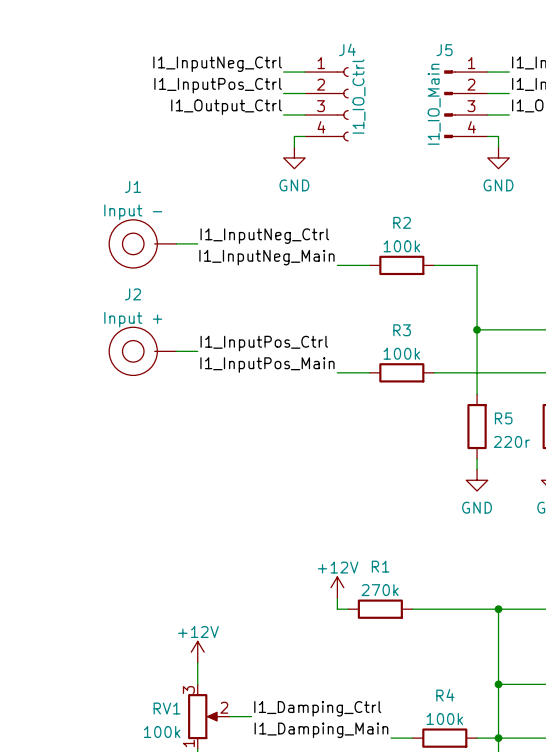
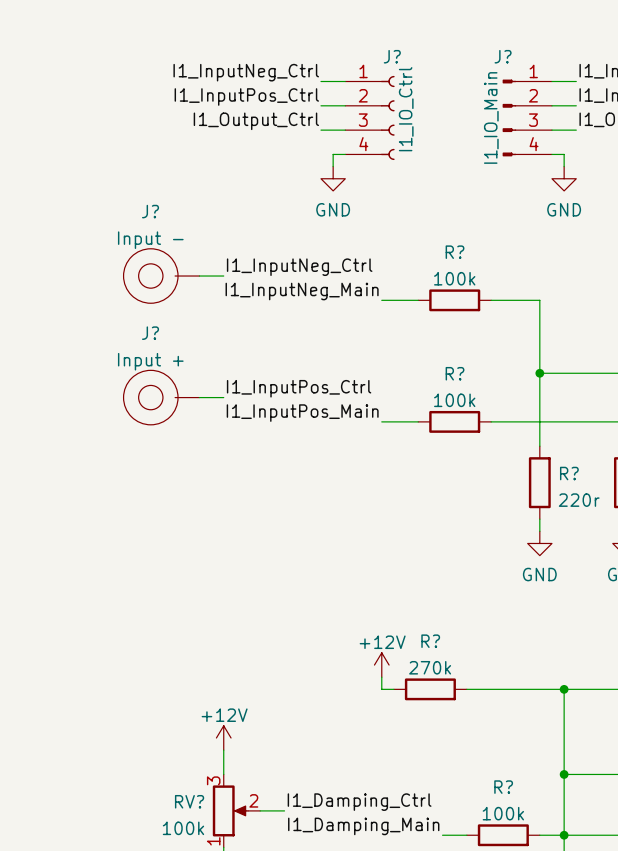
J4 name: J4 (347, 49) -> J? (392, 56)
J5 name: J5 (444, 50) -> J? (503, 56)
J1 name: J1 (133, 186) -> J? (150, 211)
R2 name: R2 (402, 222) -> R? (455, 252)
J2 name: J2 (133, 294) -> J? (150, 333)
R3 name: R3 (402, 330) -> R? (455, 373)
R5 name: R5 (503, 418) -> R? (569, 473)
R1 name: R1 (380, 566) -> R? (430, 641)
R4 name: R4 (445, 695) -> R? (503, 787)
RV1 name: RV1 (166, 708) -> RV? (189, 801)

